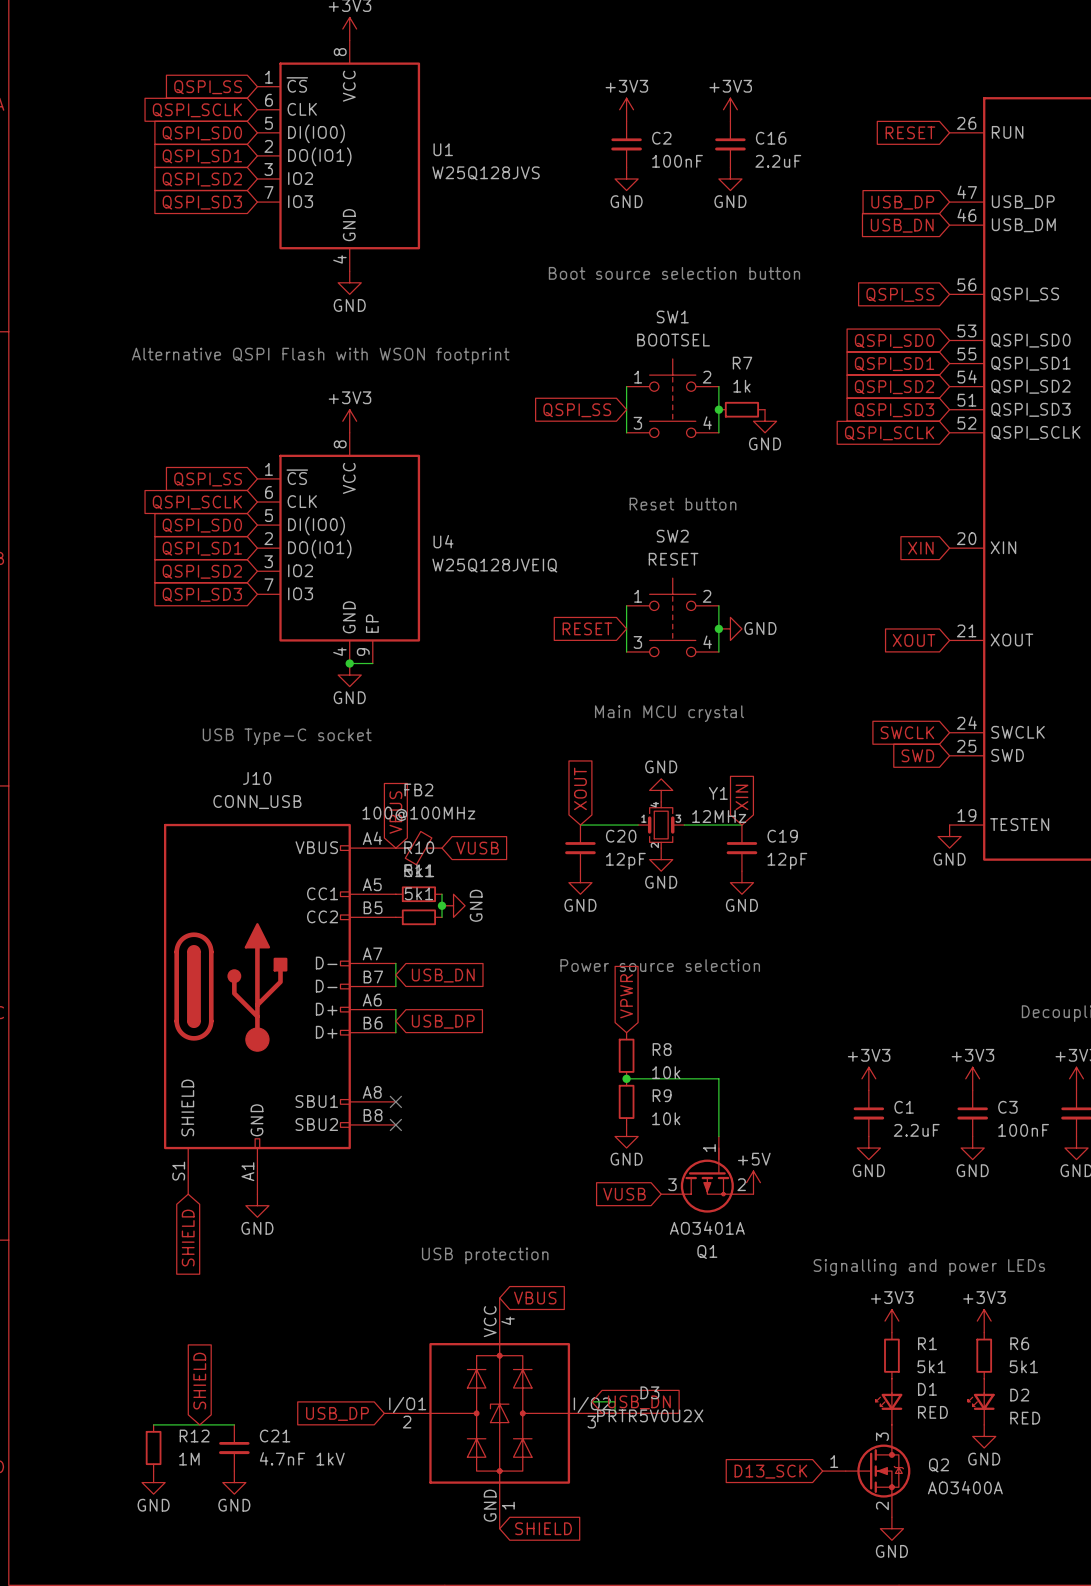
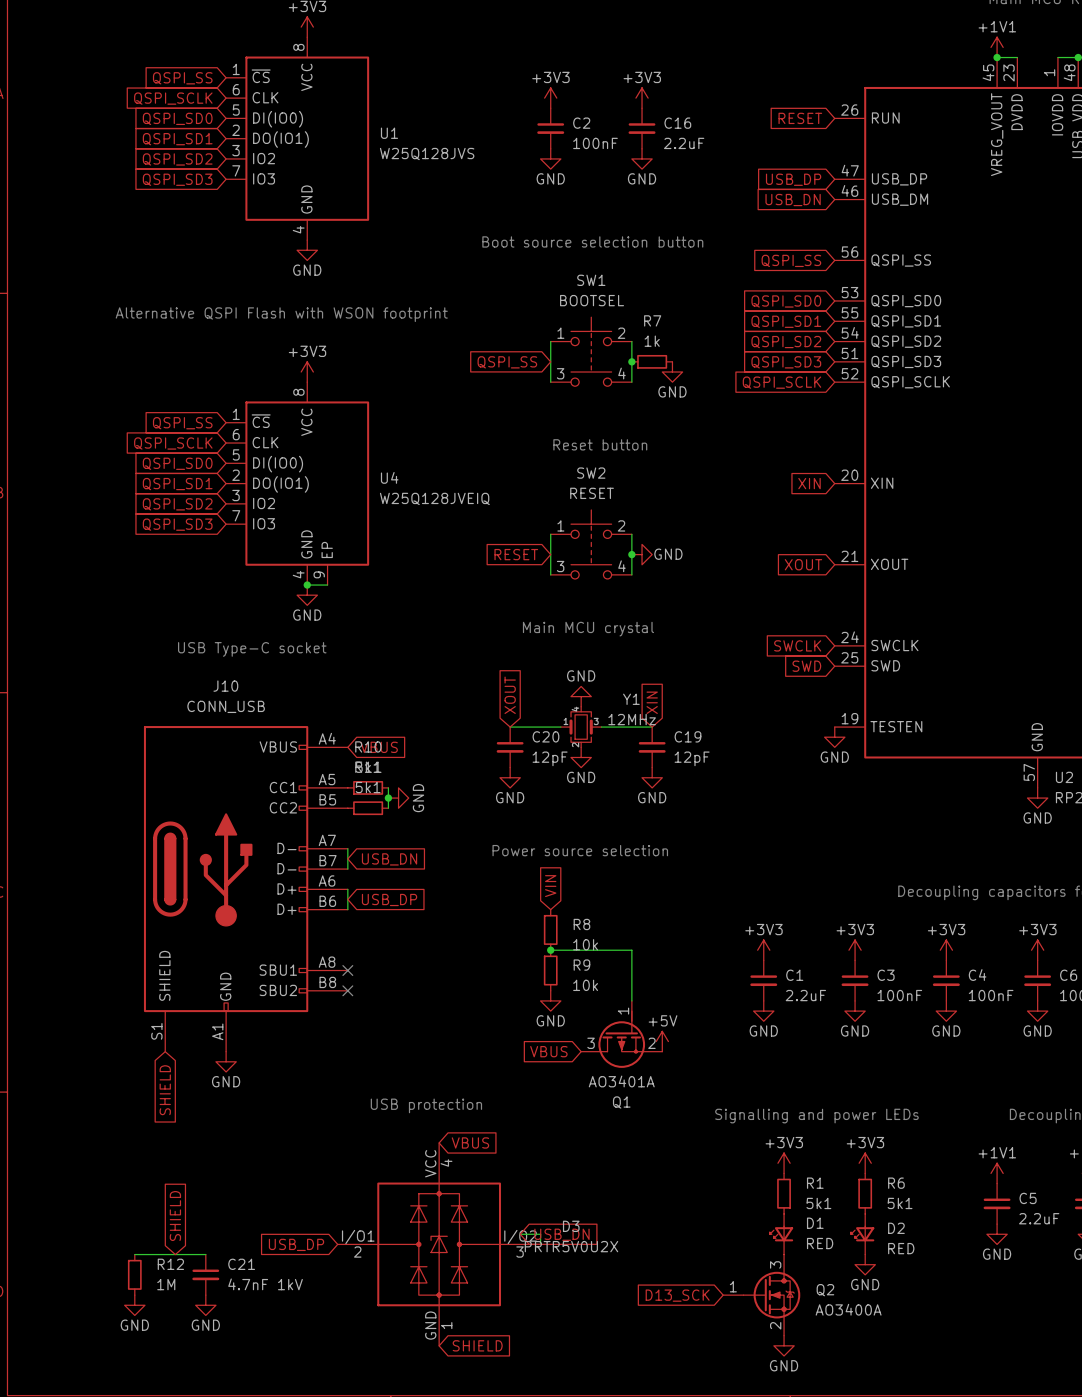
global label rotation: 0° (395, 812) -> 90° clockwise (379, 747)
FB2: 100@100MHz (418, 848) -> none
global label: VUSB (477, 848) -> none
global label: VPWR (626, 996) -> VIN (550, 886)
global label: VUSB (624, 1194) -> VBUS (548, 1051)

